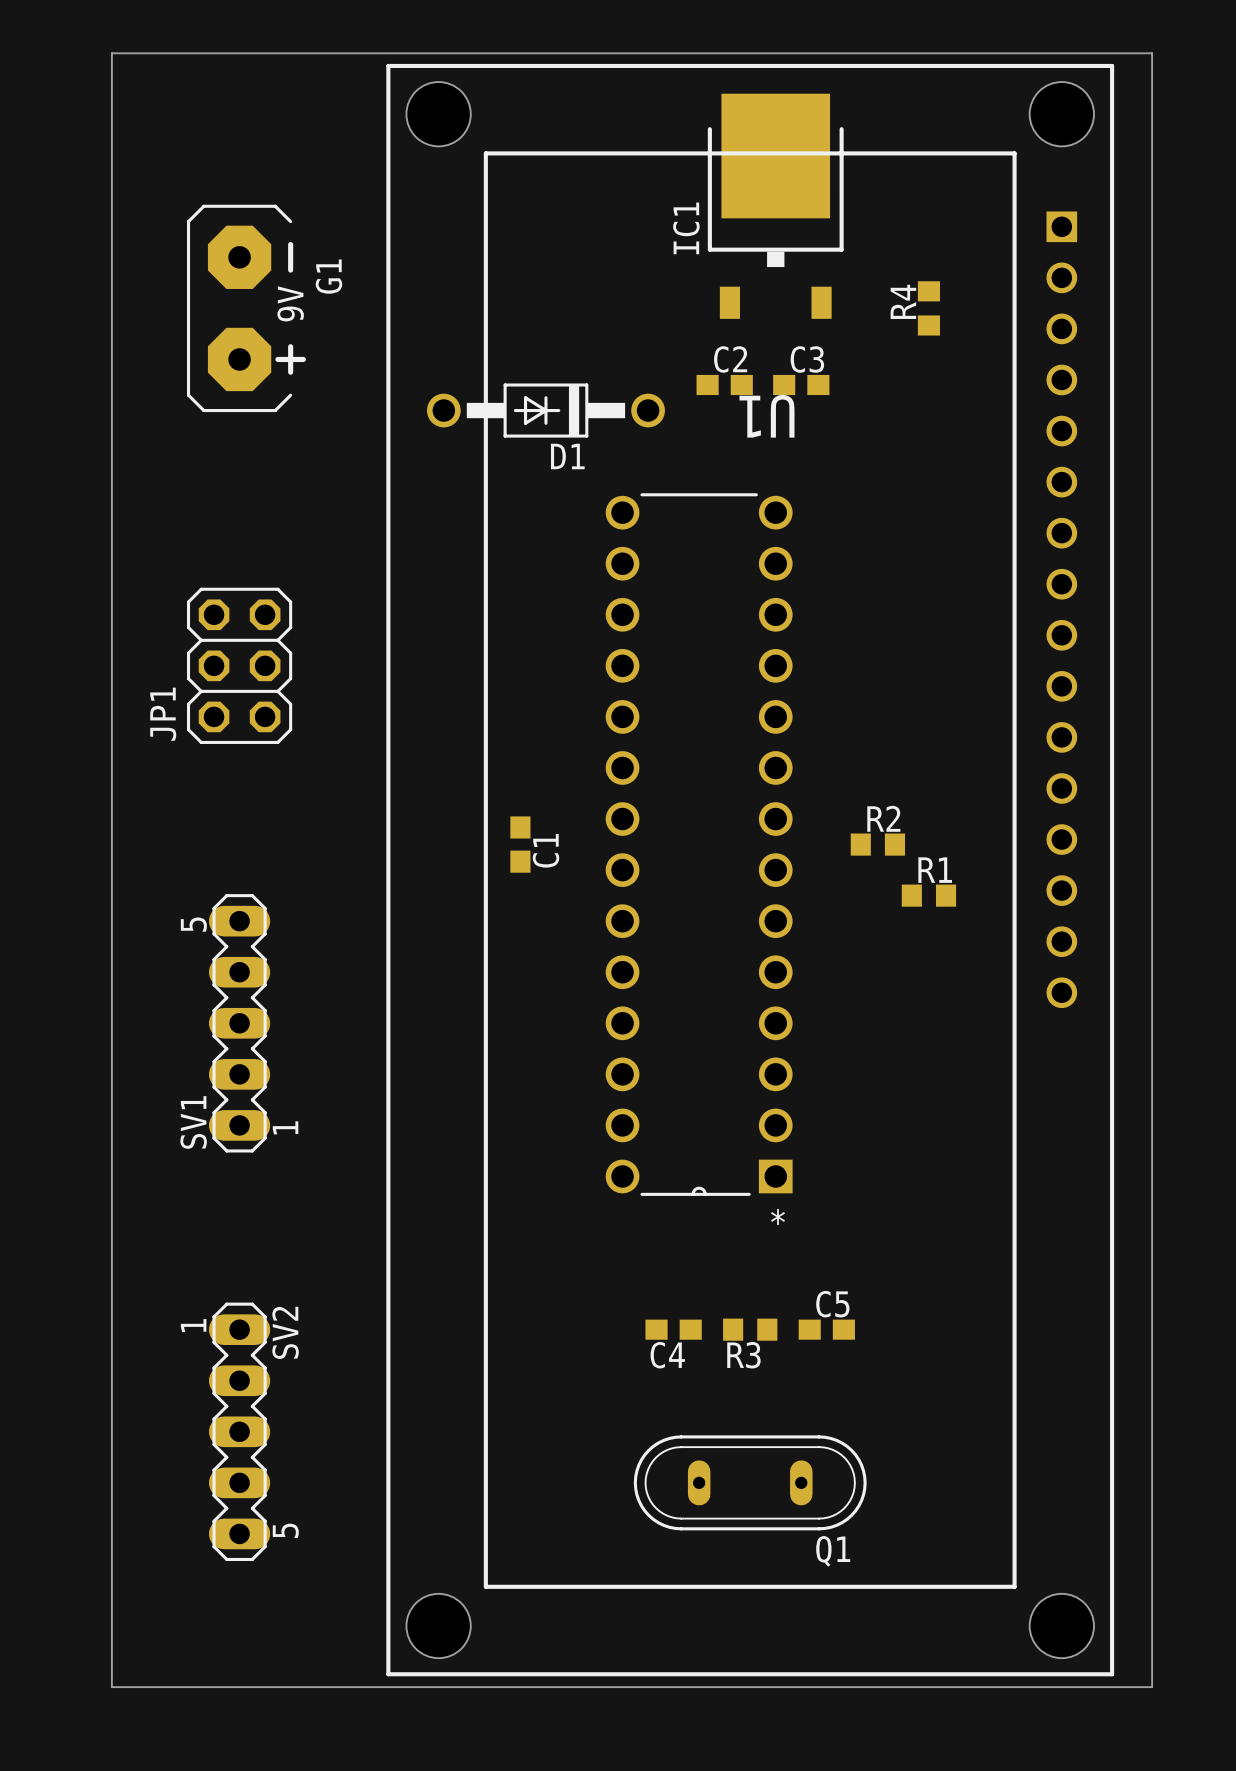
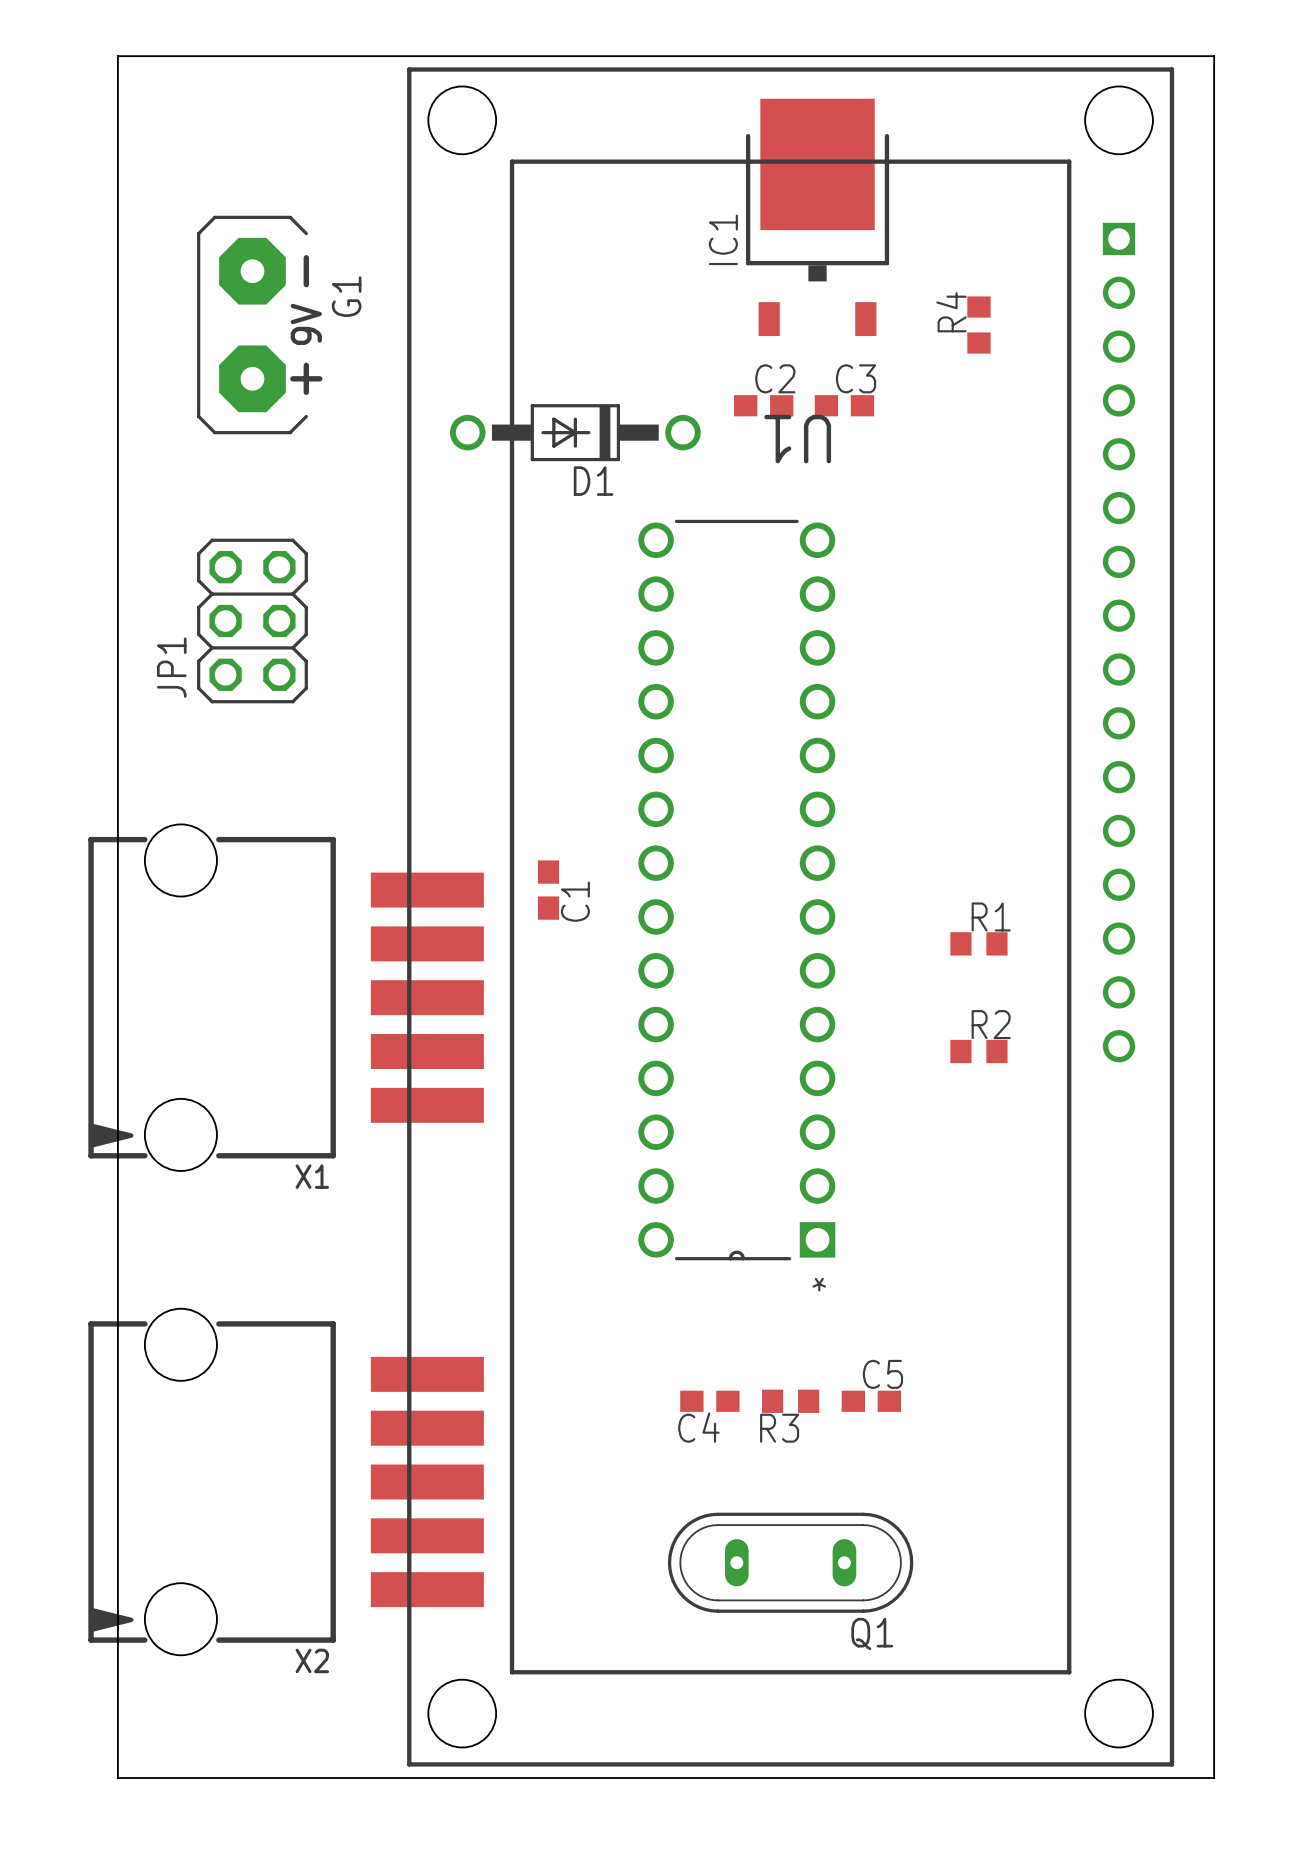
JP1 position: (239, 665) -> (252, 620)
R2 position: (877, 844) -> (978, 1051)
X1: none -> (286, 997)
SV1: (239, 1023) -> none
X2: none -> (286, 1482)
SV2: (239, 1431) -> none

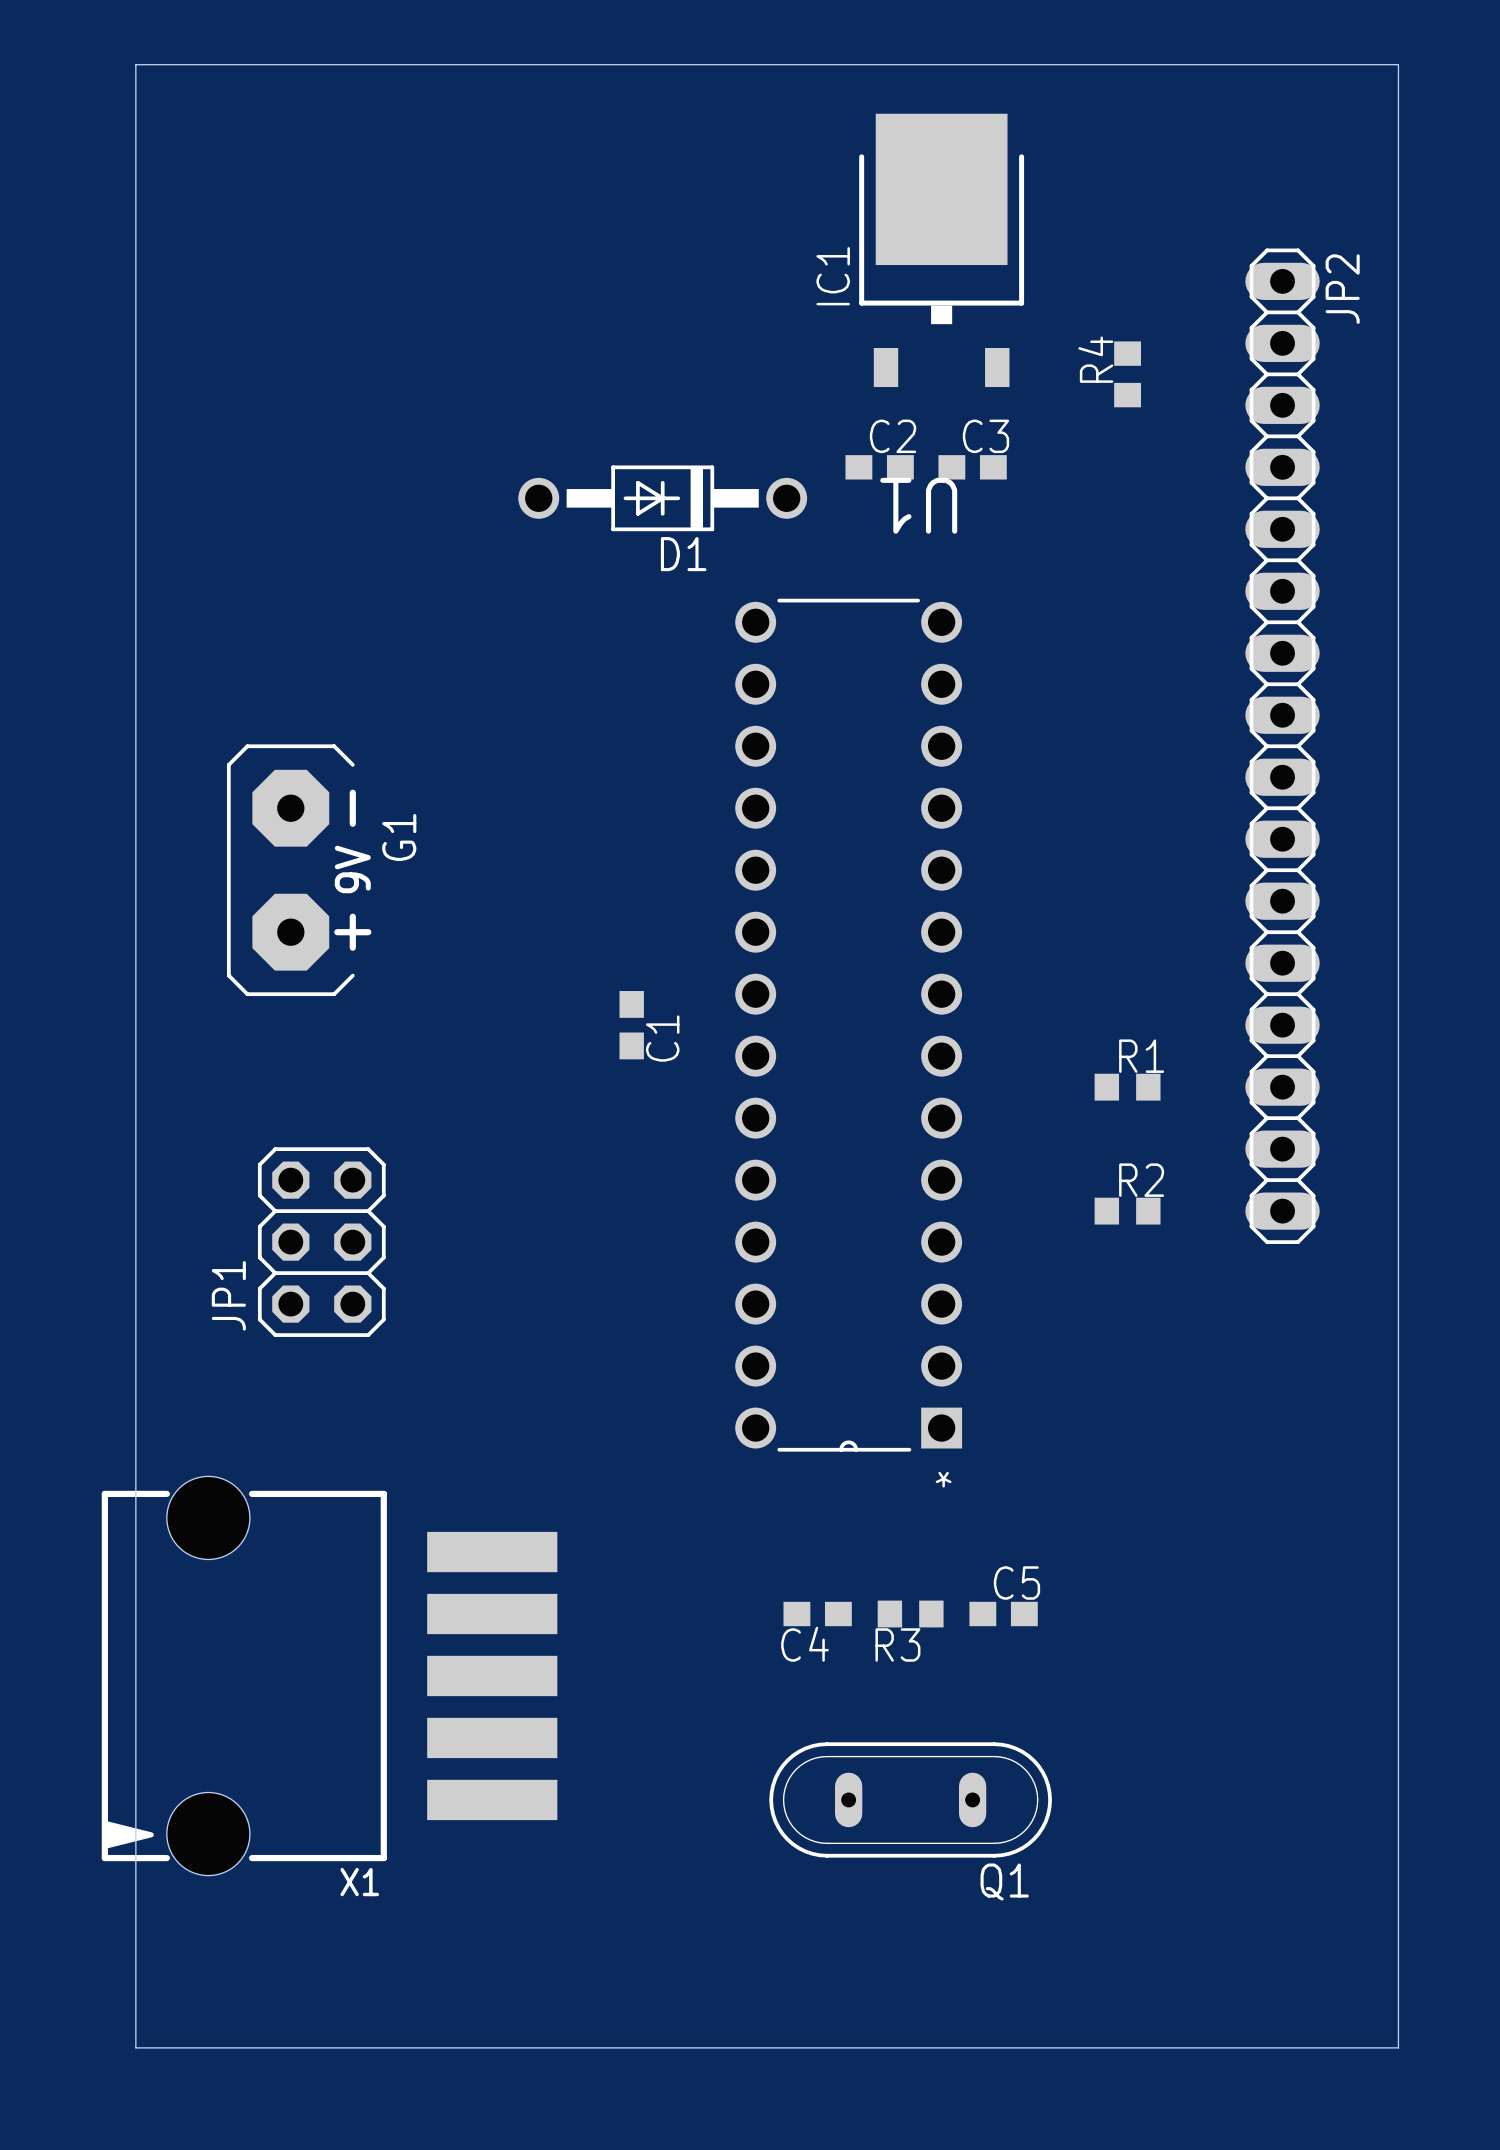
G1 position: (259, 325) -> (299, 870)
JP1 position: (252, 620) -> (321, 1242)
JP2: none -> (1282, 746)
part: (790, 916) -> none
X1 position: (286, 997) -> (329, 1675)
X2: (286, 1482) -> none

